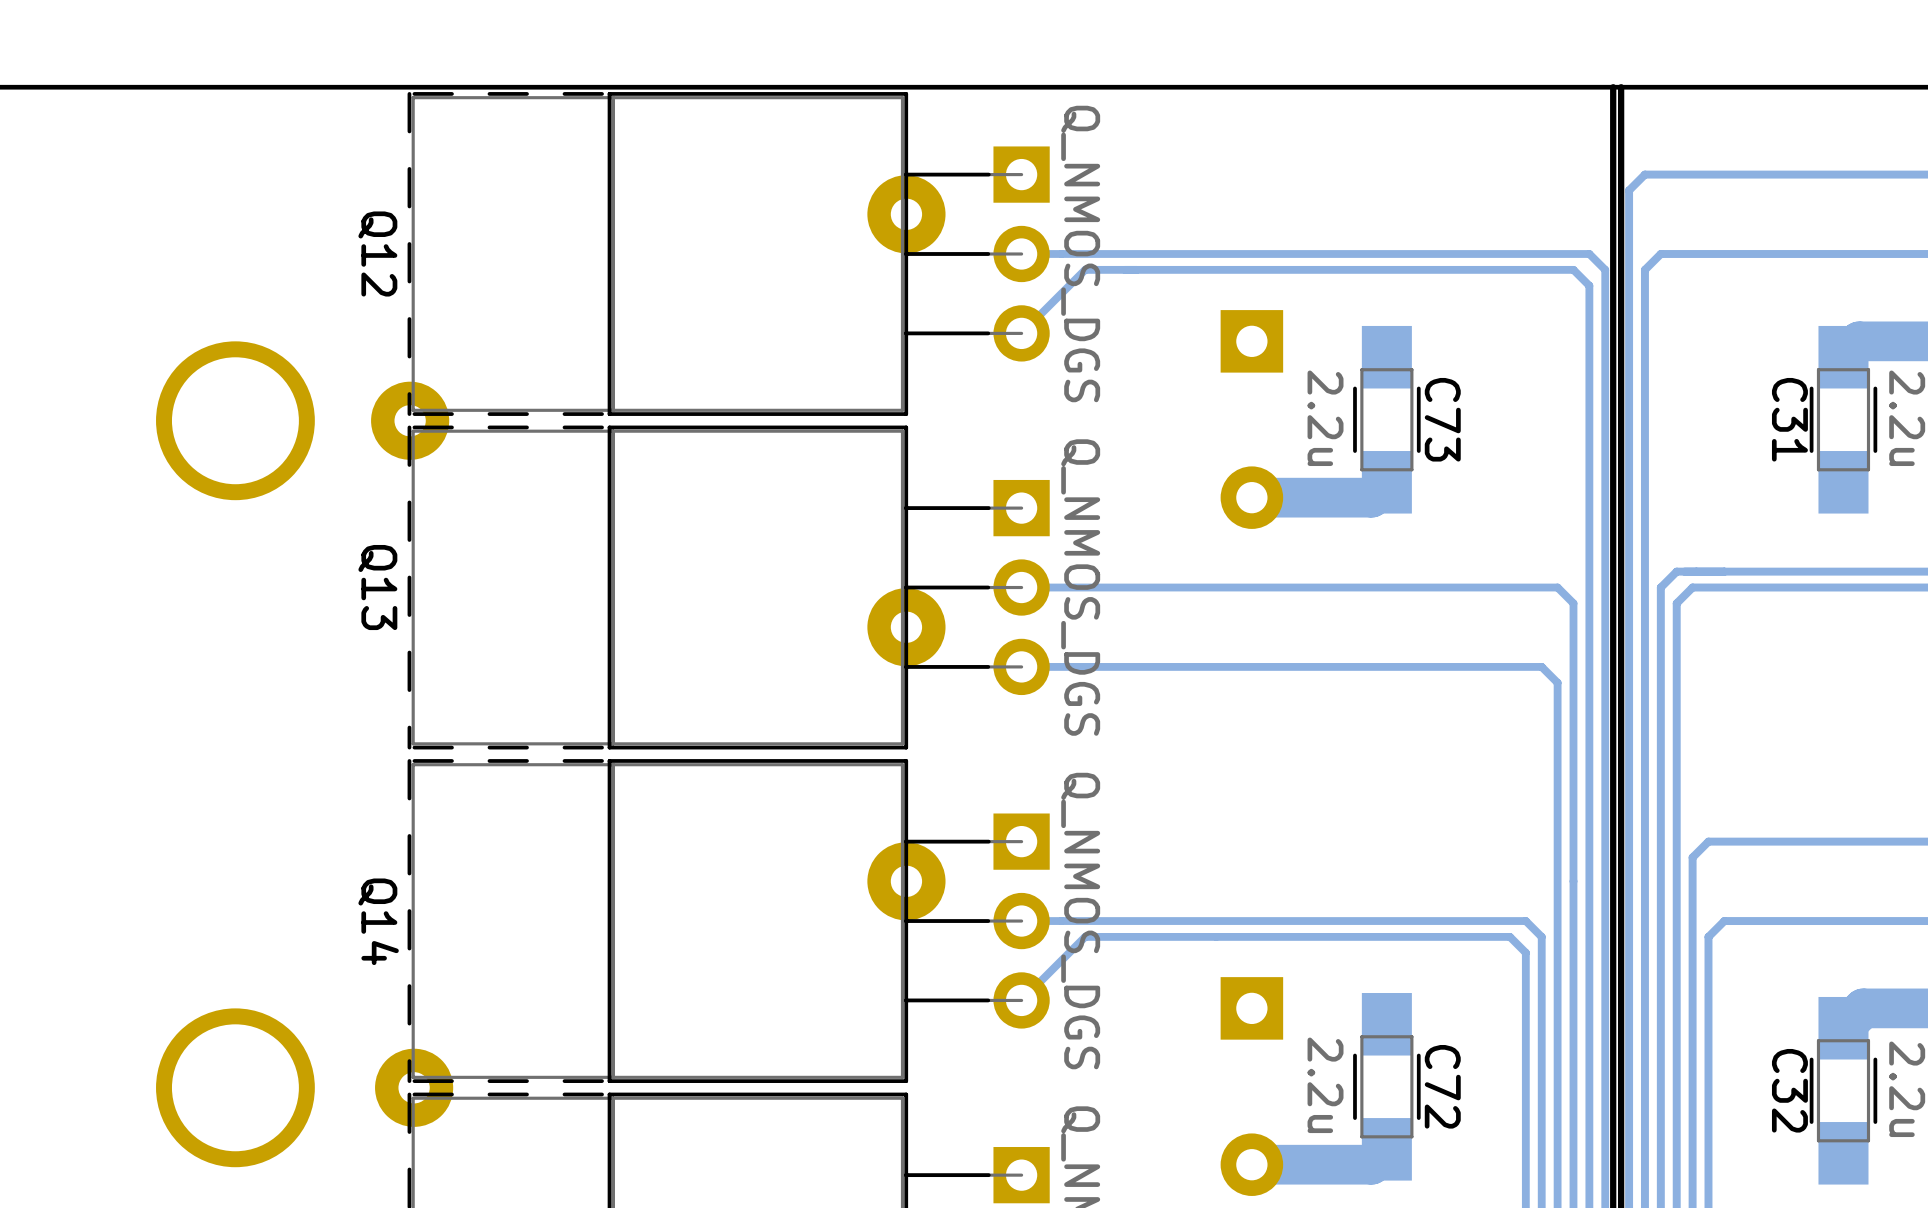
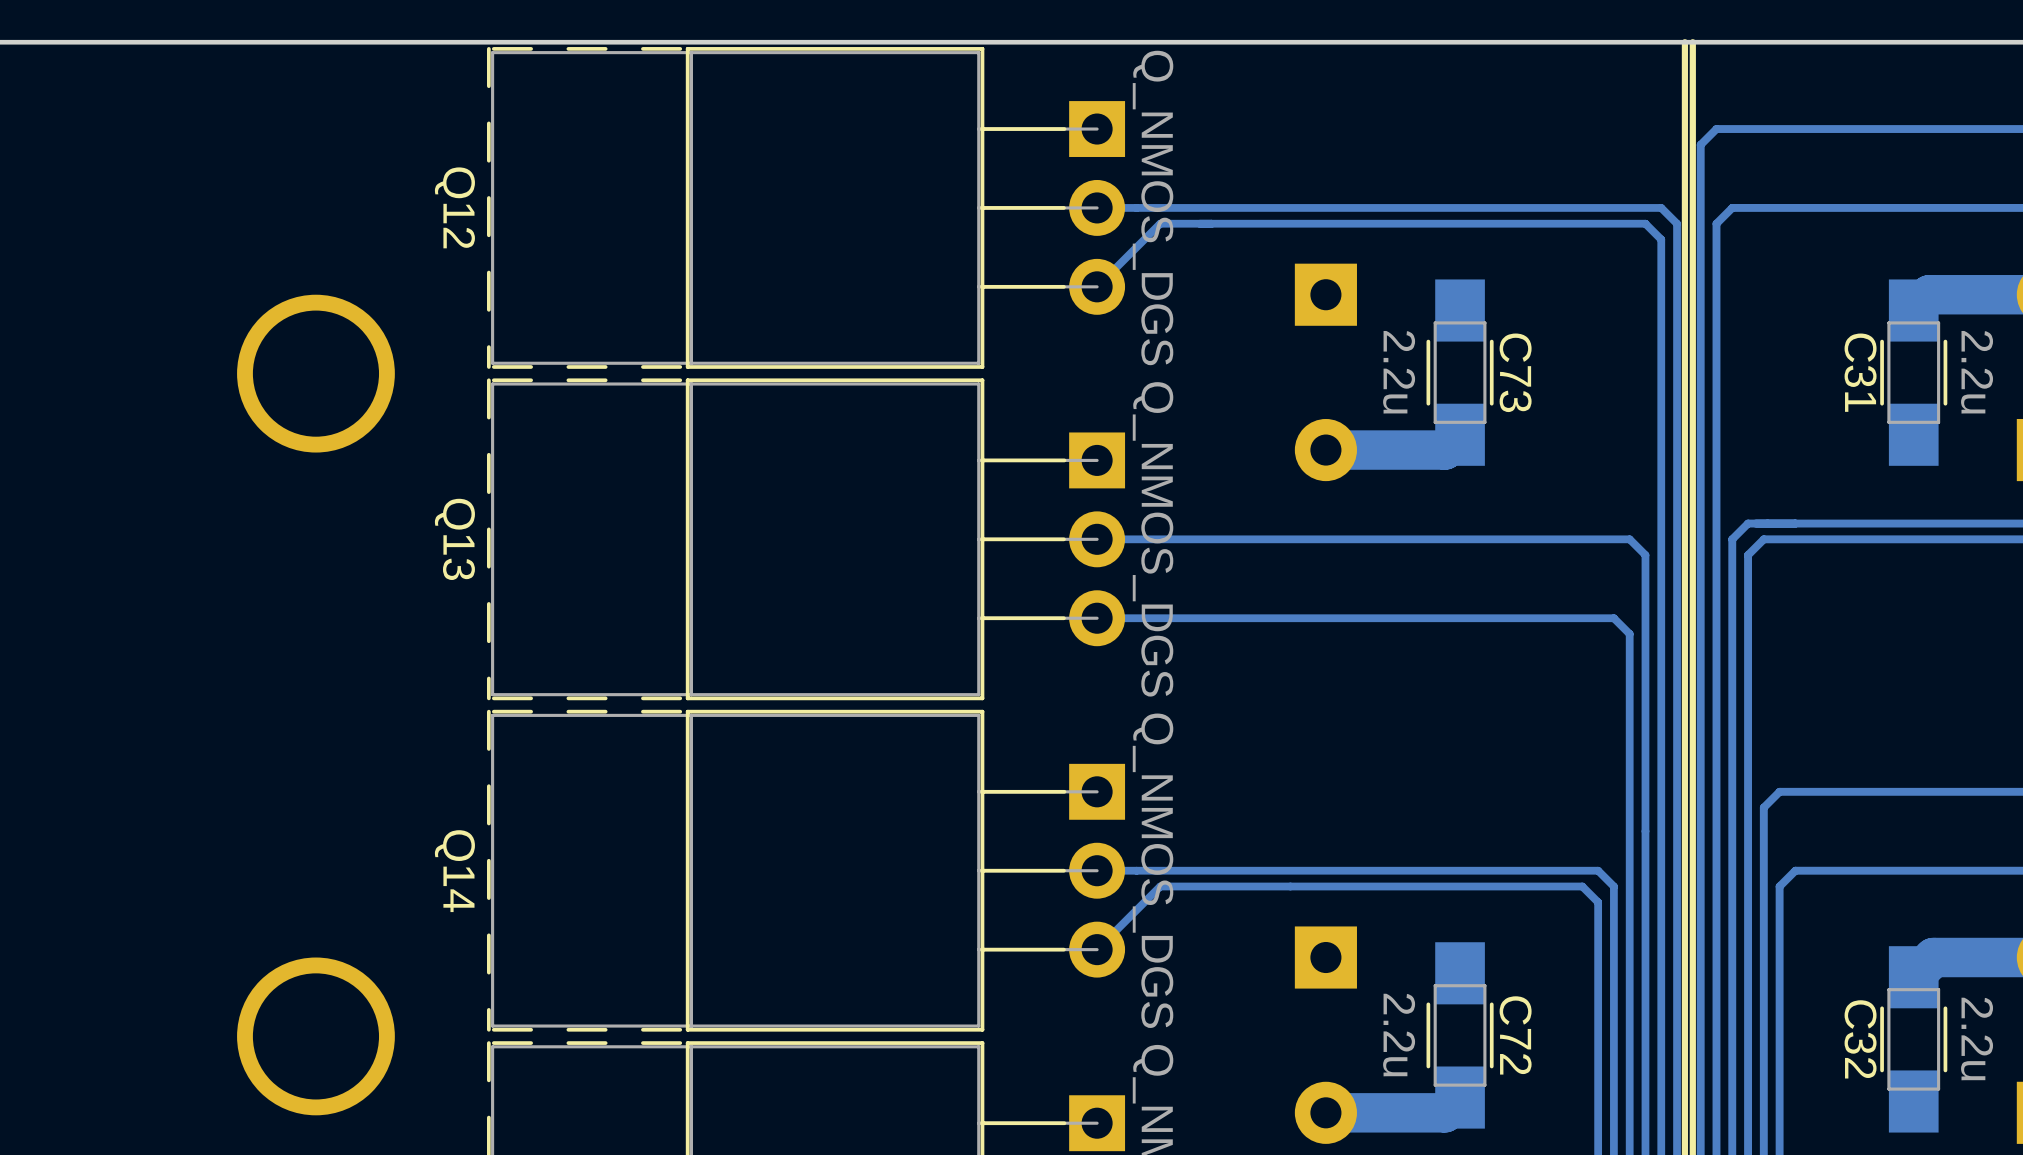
part: (906, 214) -> none
part: (410, 420) -> none
part: (906, 627) -> none
part: (906, 881) -> none
part: (414, 1087) -> none

